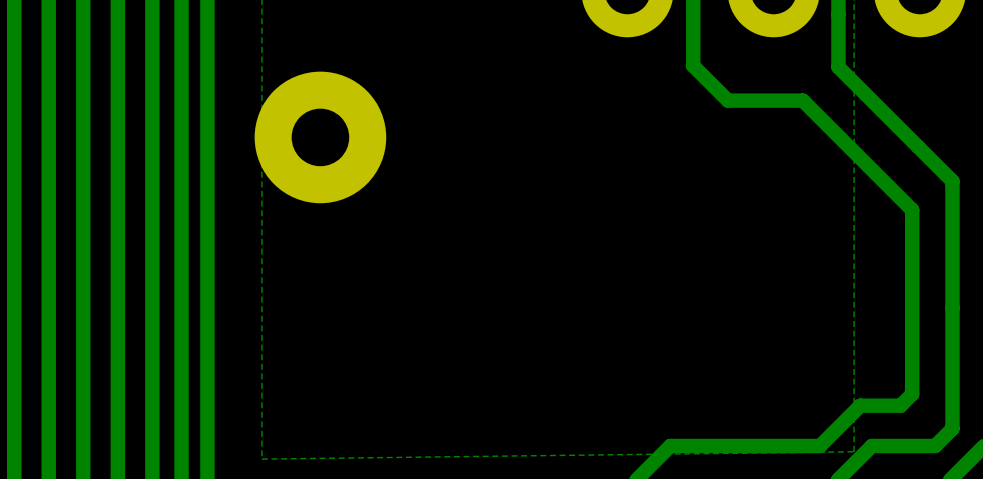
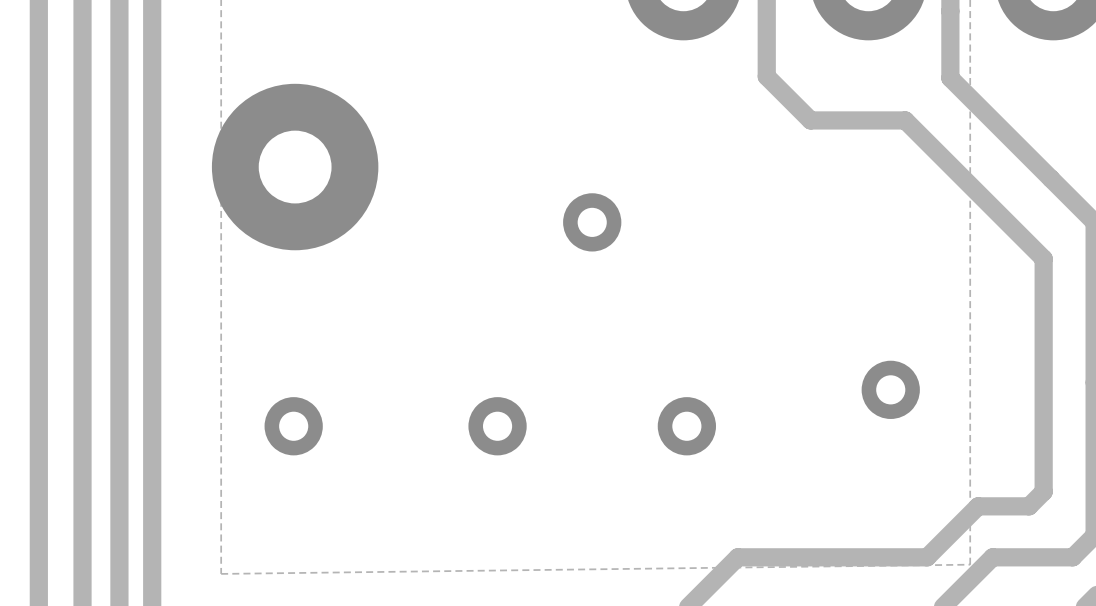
via: none -> (592, 222)
via: none -> (890, 389)
via: none -> (293, 426)
via: none -> (497, 426)
via: none -> (686, 426)

